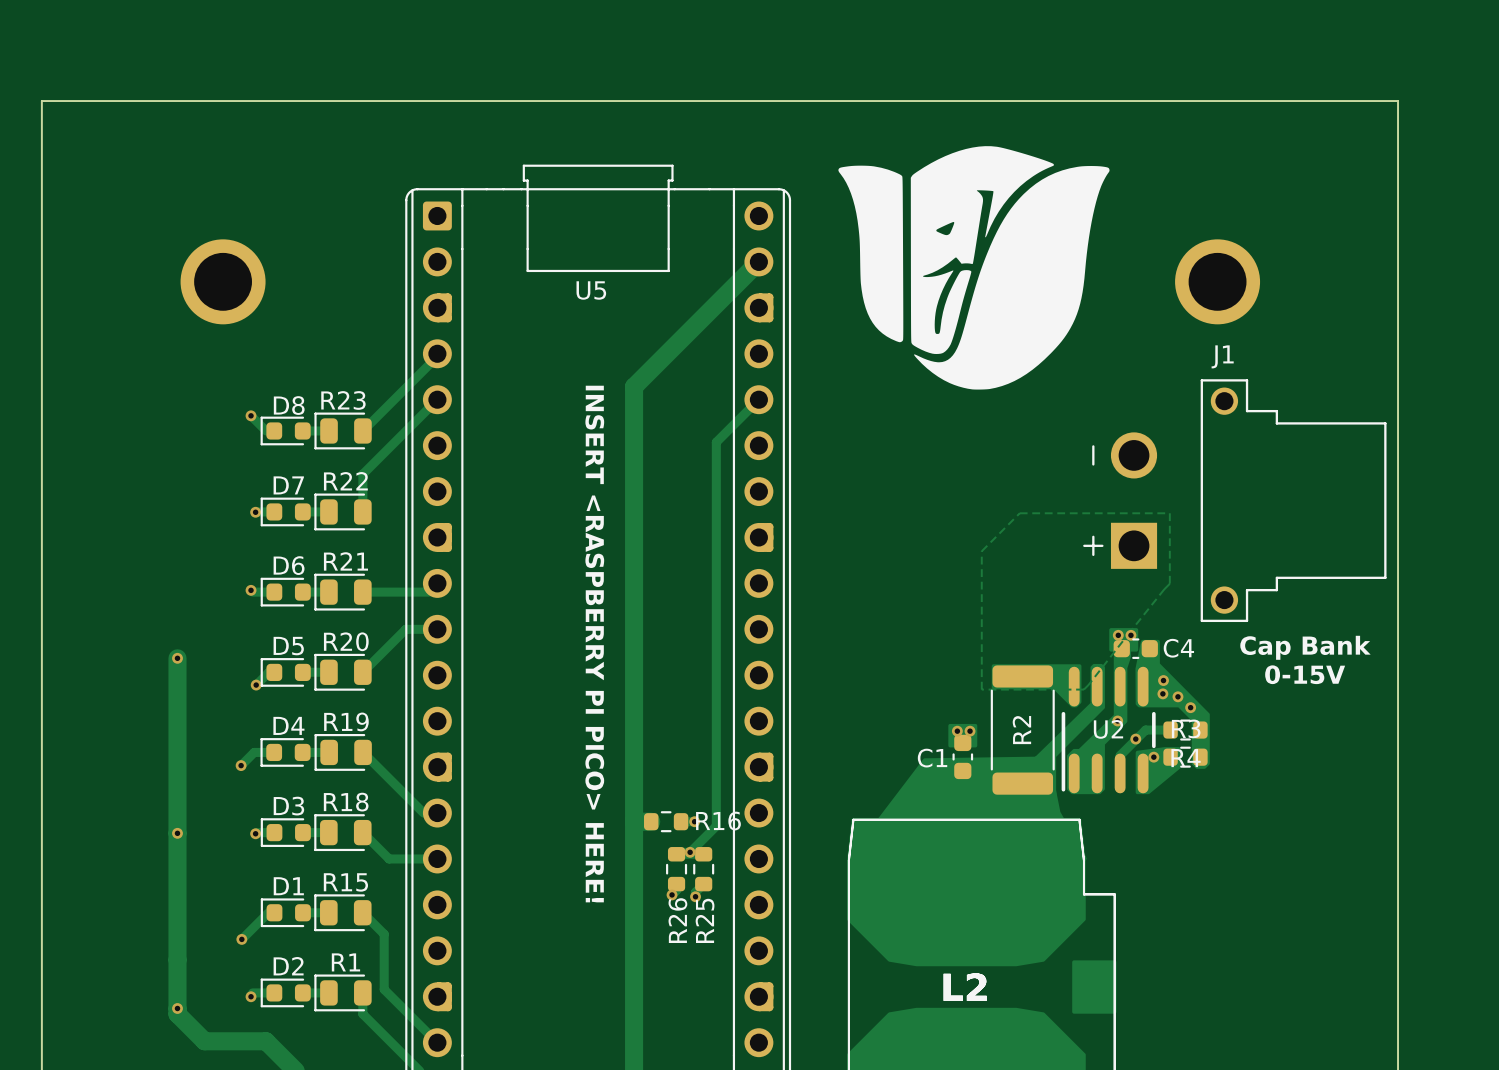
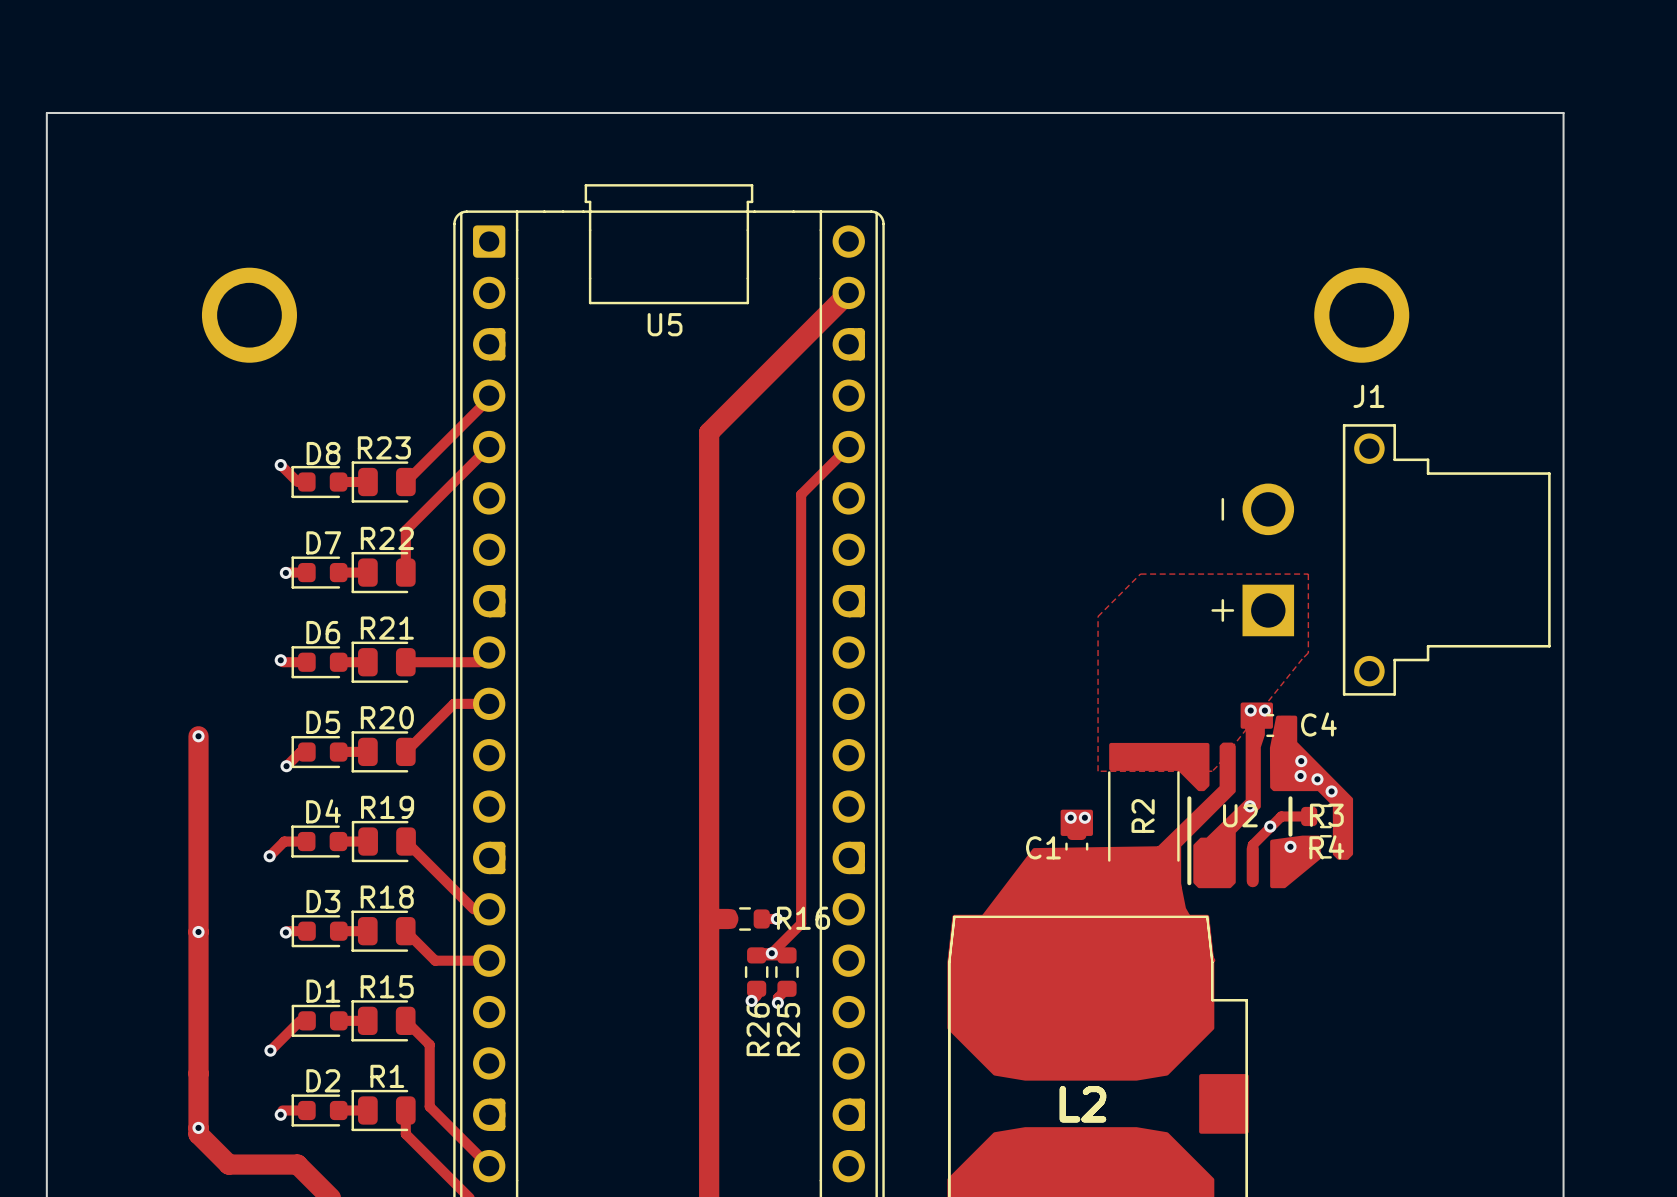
drawing: [838, 146, 1110, 390] -> none
text: INSERT <RASPBERRY PI PICO> HERE! (594, 644) -> none
text: Cap Bank (1305, 647) -> none
text: 0-15V (1305, 674) -> none

